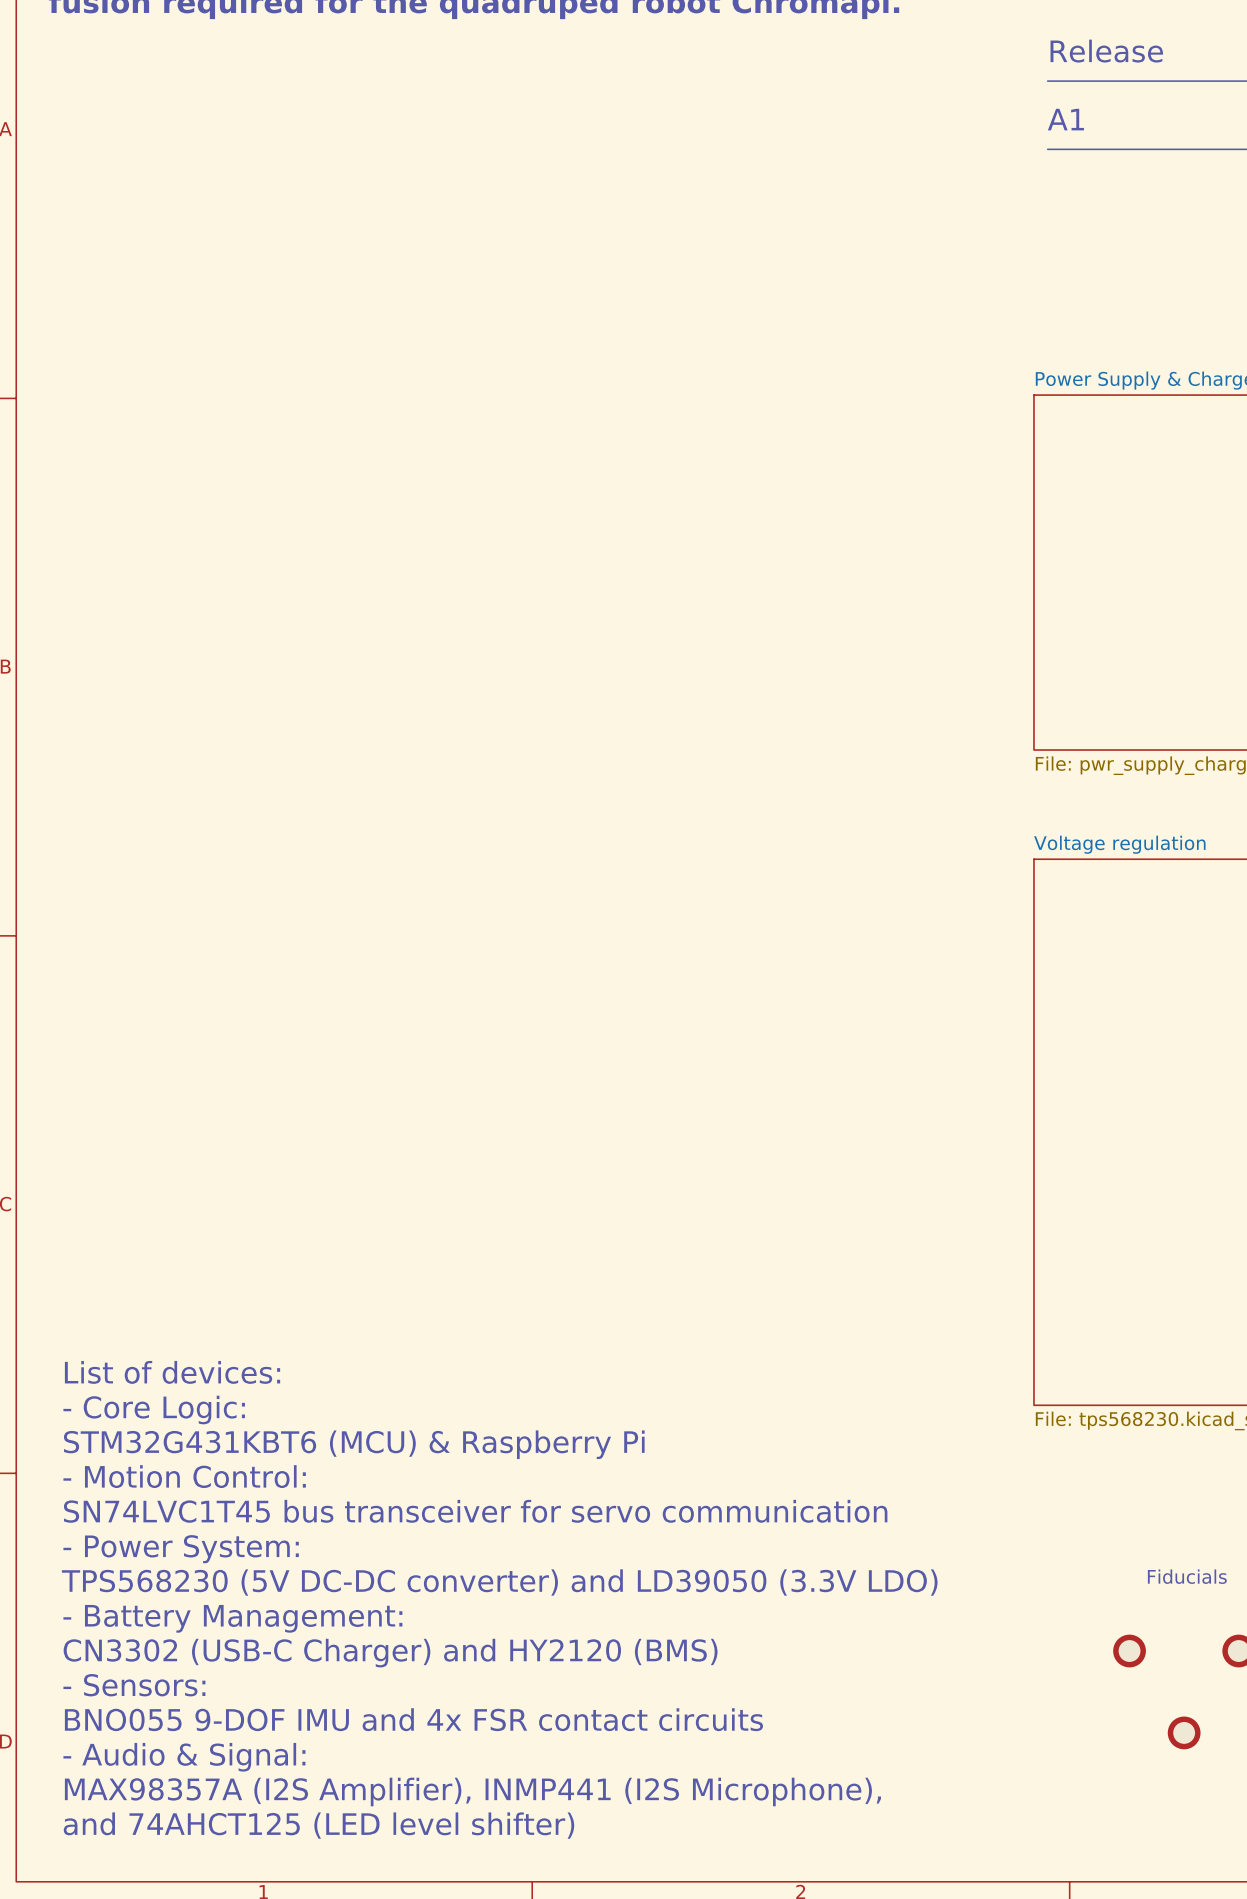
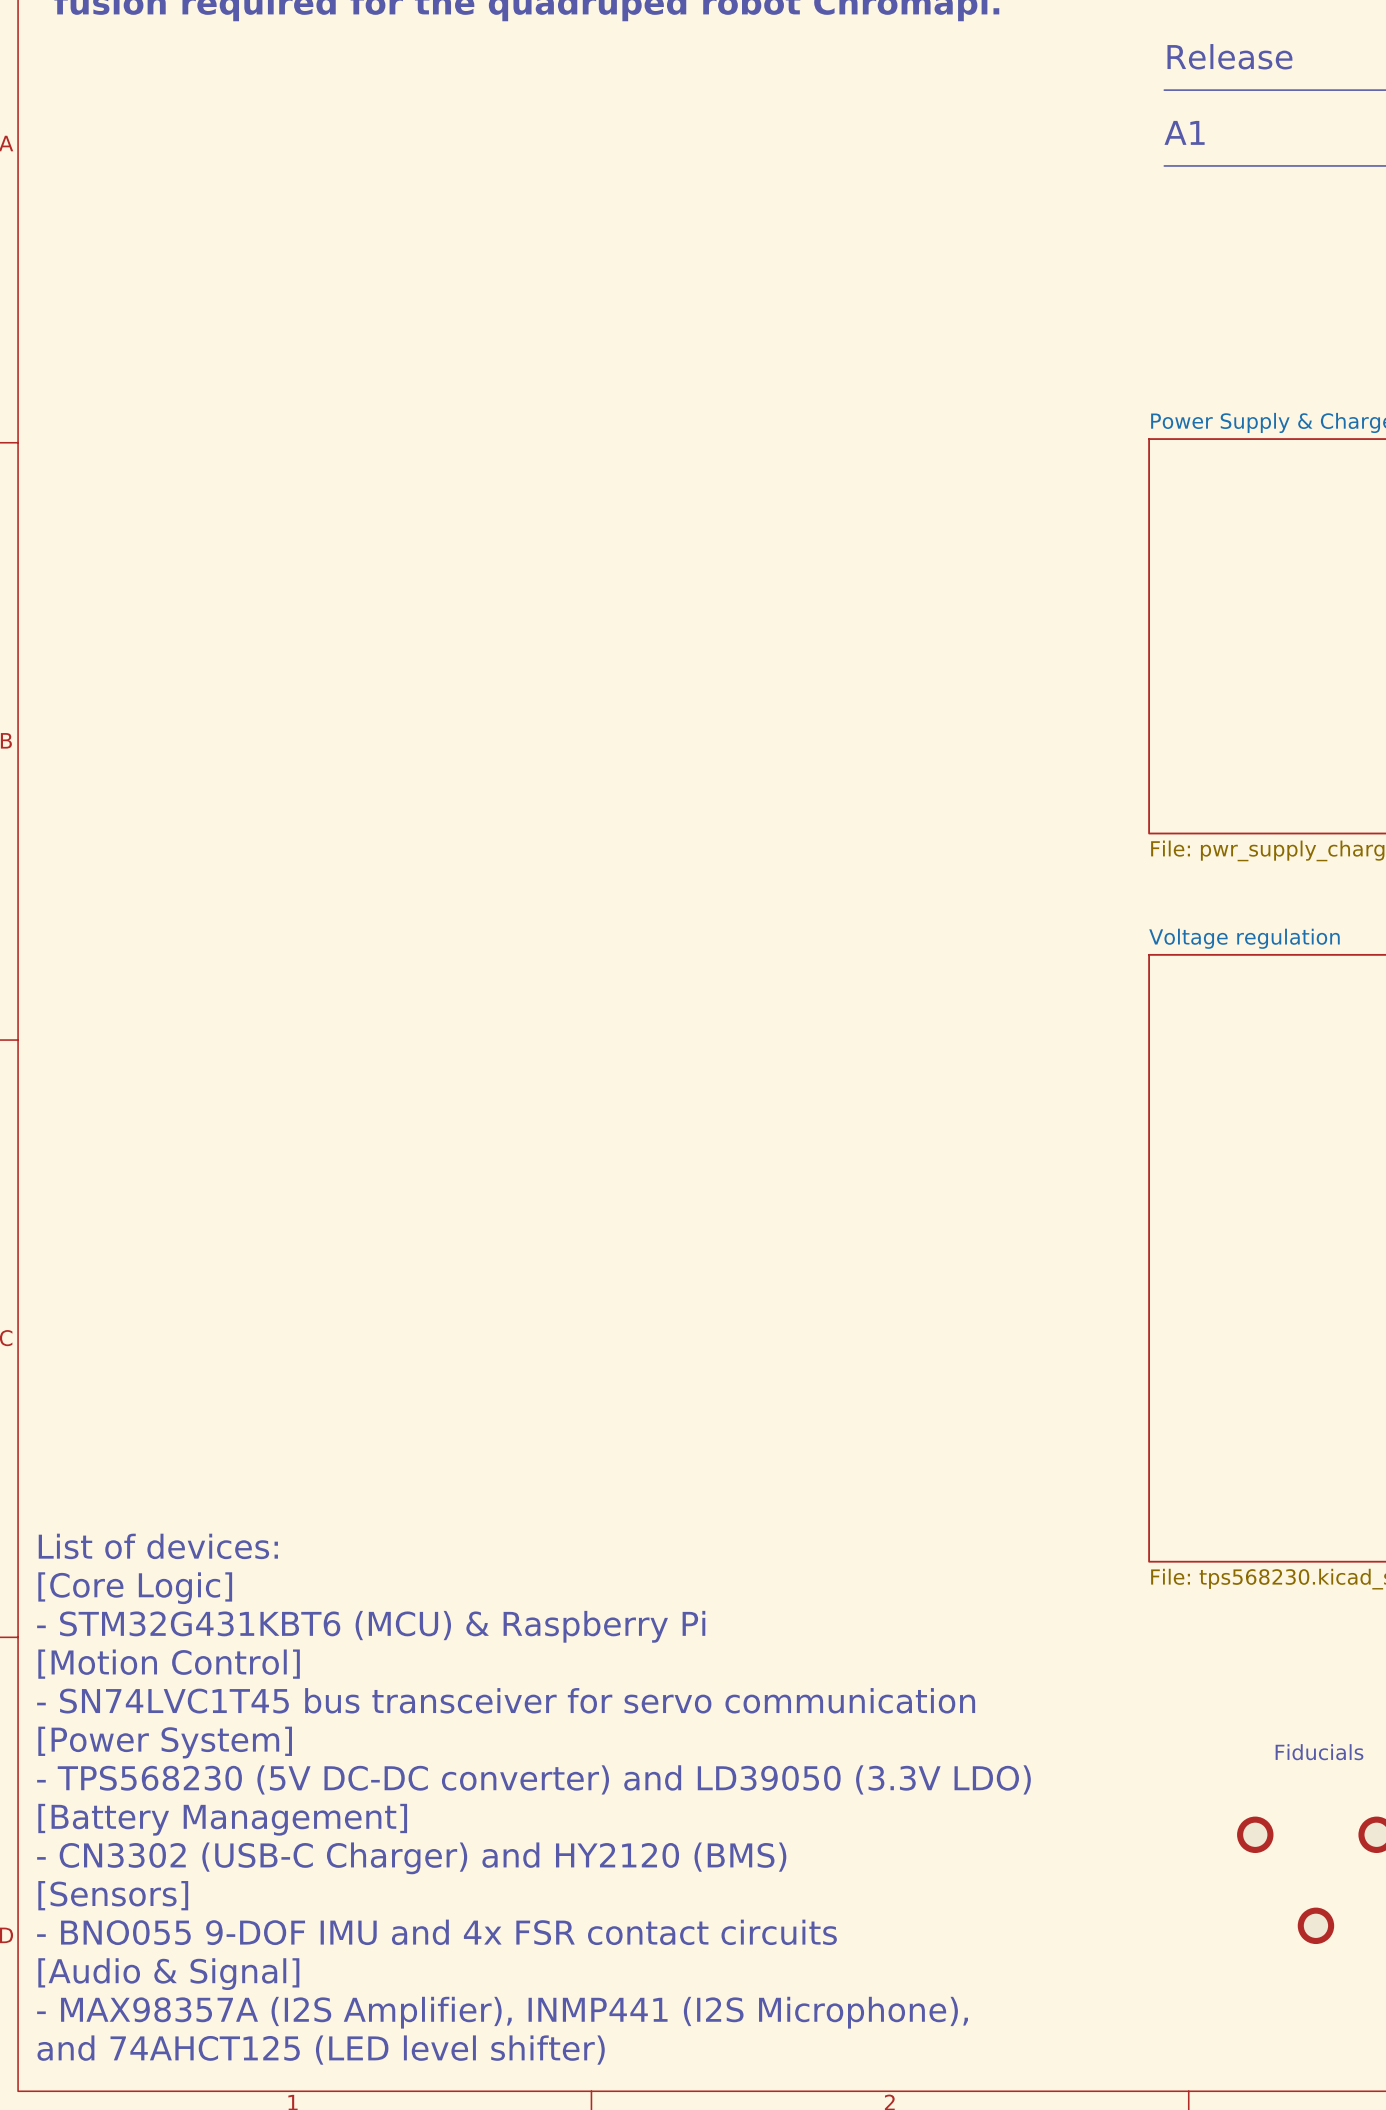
text position: List of devices: (172, 1372) -> List of devices: (158, 1546)
text: - Core Logic: (154, 1410) -> [Core Logic] (135, 1588)
text: STM32G431KBT6 (MCU) & Raspberry Pi (354, 1444) -> - STM32G431KBT6 (MCU) & Raspberry Pi (371, 1626)
text: - Motion Control: (184, 1476) -> [Motion Control] (169, 1664)
text: SN74LVC1T45 bus transceiver for servo communication (475, 1511) -> - SN74LVC1T45 bus transceiver for servo communication (506, 1700)
text: - Power System: (181, 1549) -> [Power System] (165, 1742)
text: TPS568230 (5V DC-DC converter) and LD39050 (3.3V LDO) (499, 1582) -> - TPS568230 (5V DC-DC converter) and LD39050 (3.3V LDO) (533, 1779)
text: - Battery Management: (232, 1618) -> [Battery Management] (222, 1819)
text: CN3302 (USB-C Charger) and HY2120 (BMS) (390, 1653) -> - CN3302 (USB-C Charger) and HY2120 (BMS) (411, 1858)
text: - Sensors: (134, 1685) -> [Sensors] (113, 1895)
text: BNO055 9-DOF IMU and 4x FSR contact circuits (413, 1719) -> - BNO055 9-DOF IMU and 4x FSR contact circuits (437, 1932)
text: - Audio & Signal: (184, 1757) -> [Audio & Signal] (168, 1974)
text: MAX98357A (I2S Amplifier), INMP441 (I2S Microphone), (472, 1791) -> - MAX98357A (I2S Amplifier), INMP441 (I2S Microphone), (502, 2012)
text position: and 74AHCT125 (LED level shifter) (318, 1825) -> and 74AHCT125 (LED level shifter) (321, 2050)

